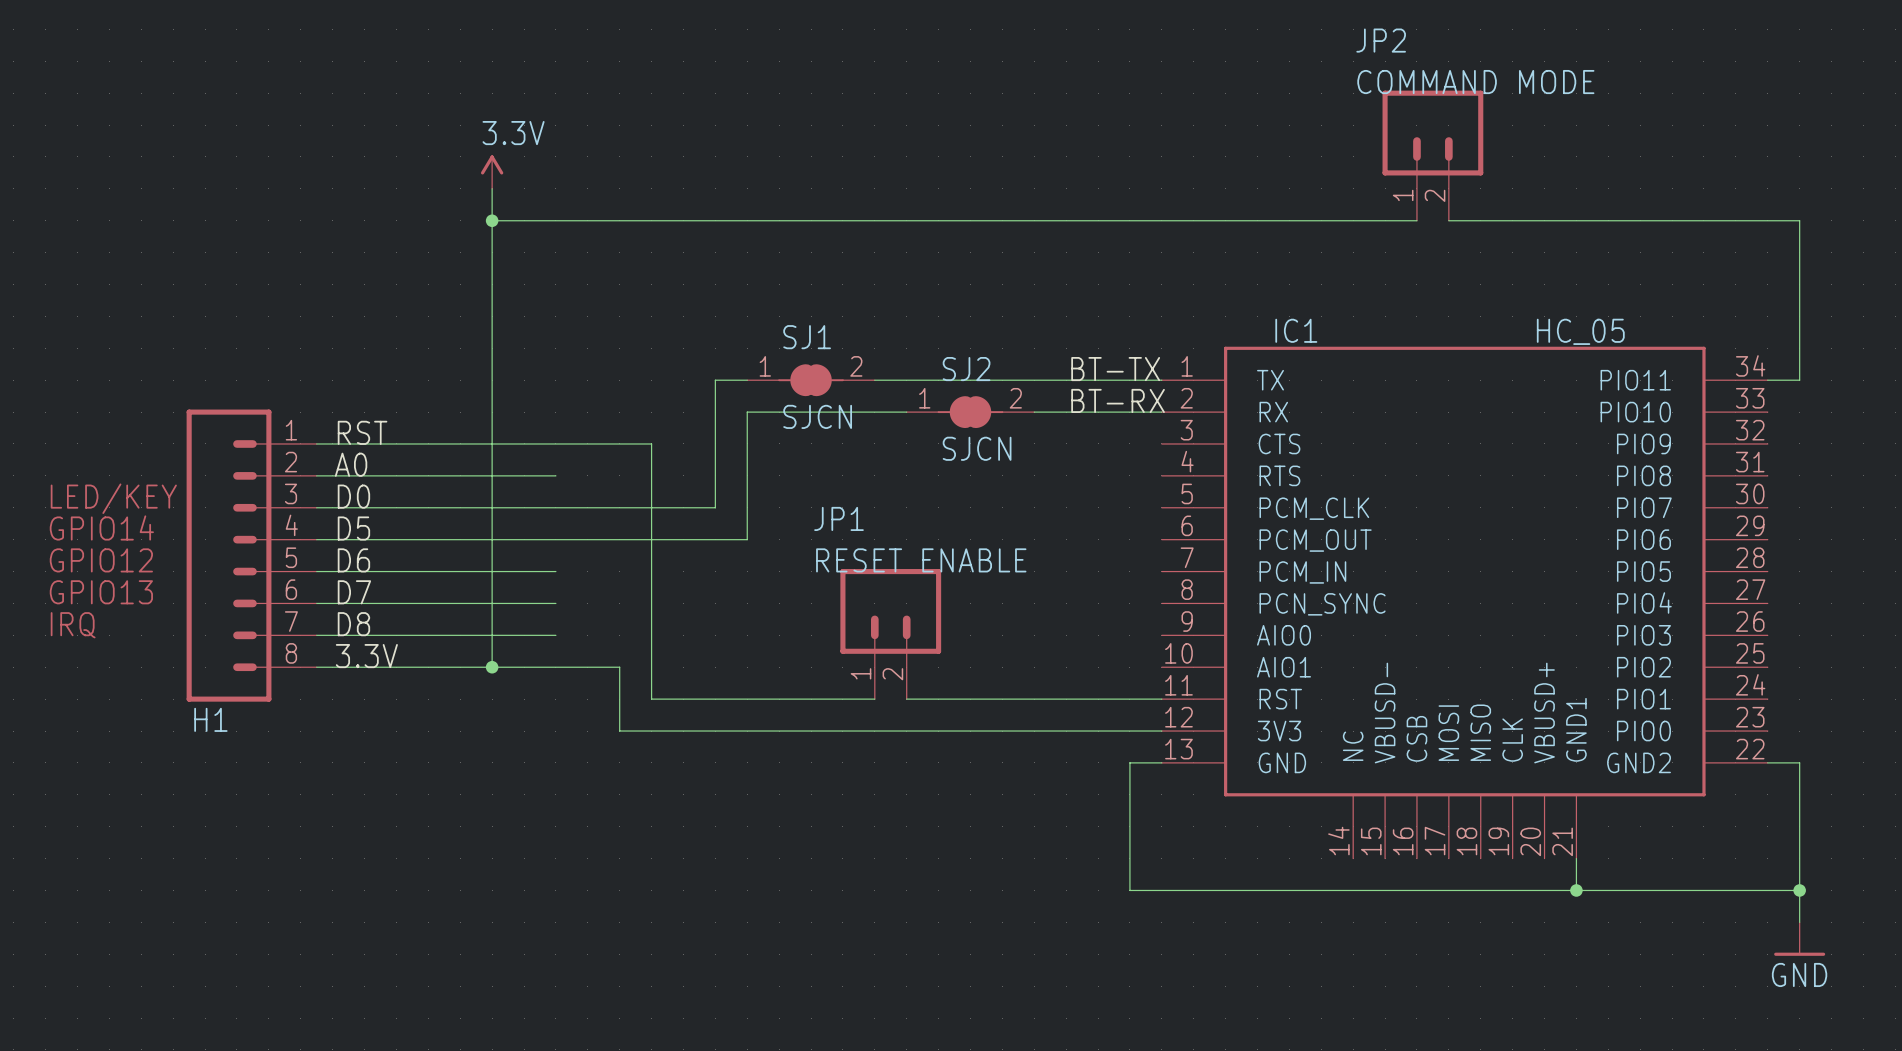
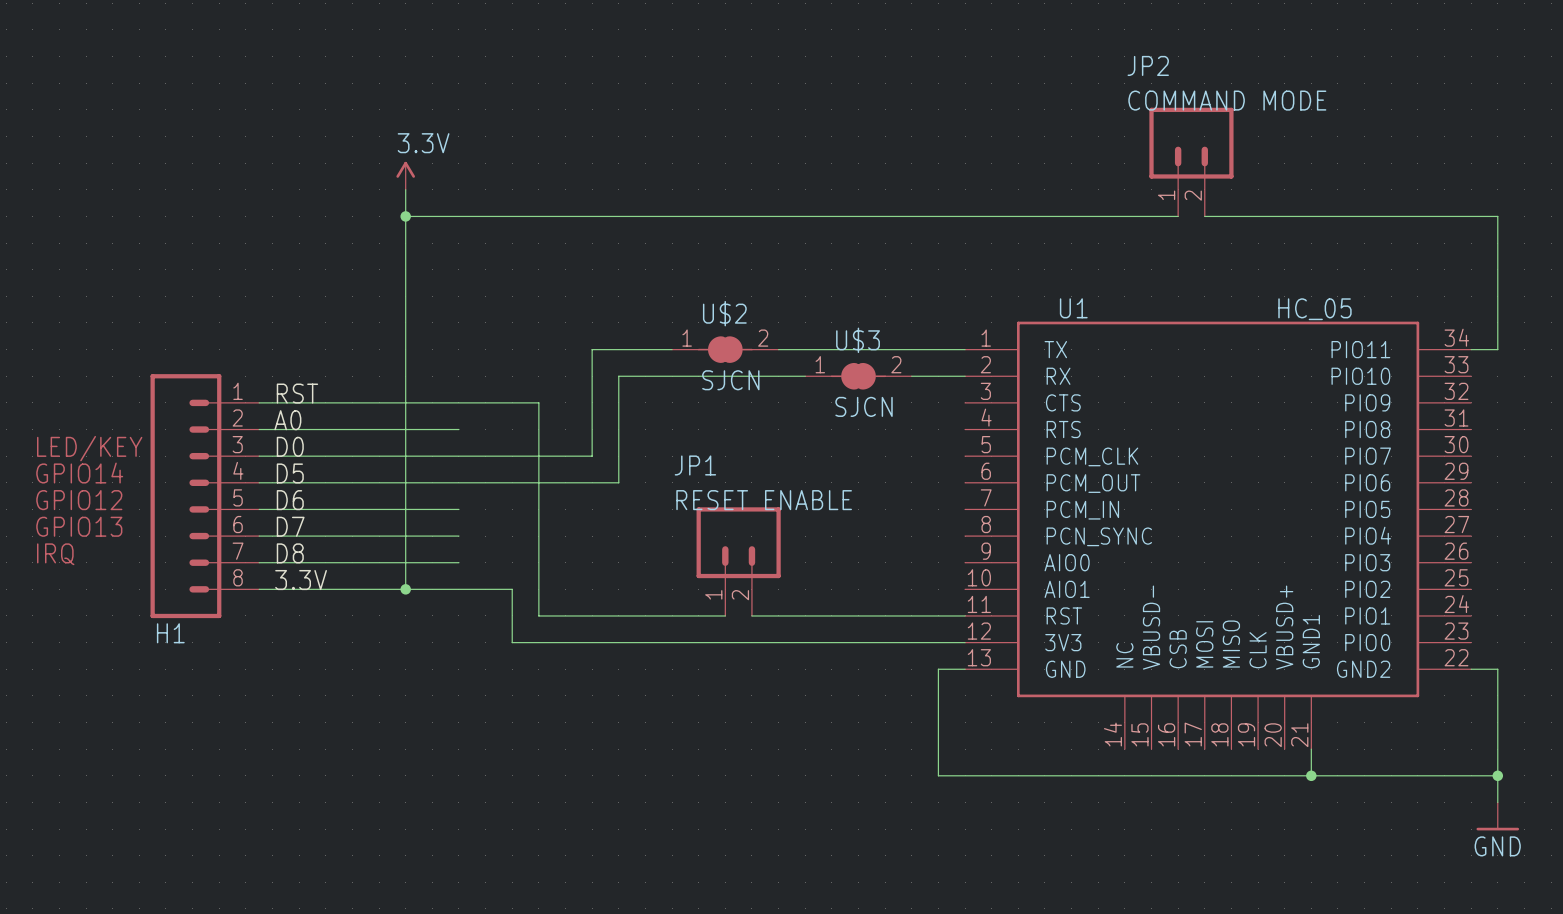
IC1 name: IC1 (1296, 330) -> U1 (1073, 308)
label: BT-TX (1115, 369) -> none
SJ1: SJCN (811, 380) -> none
U$2: none -> SJCN (725, 349)
label: BT-RX (1118, 400) -> none
SJ2: SJCN (970, 412) -> none
U$3: none -> SJCN (858, 376)

